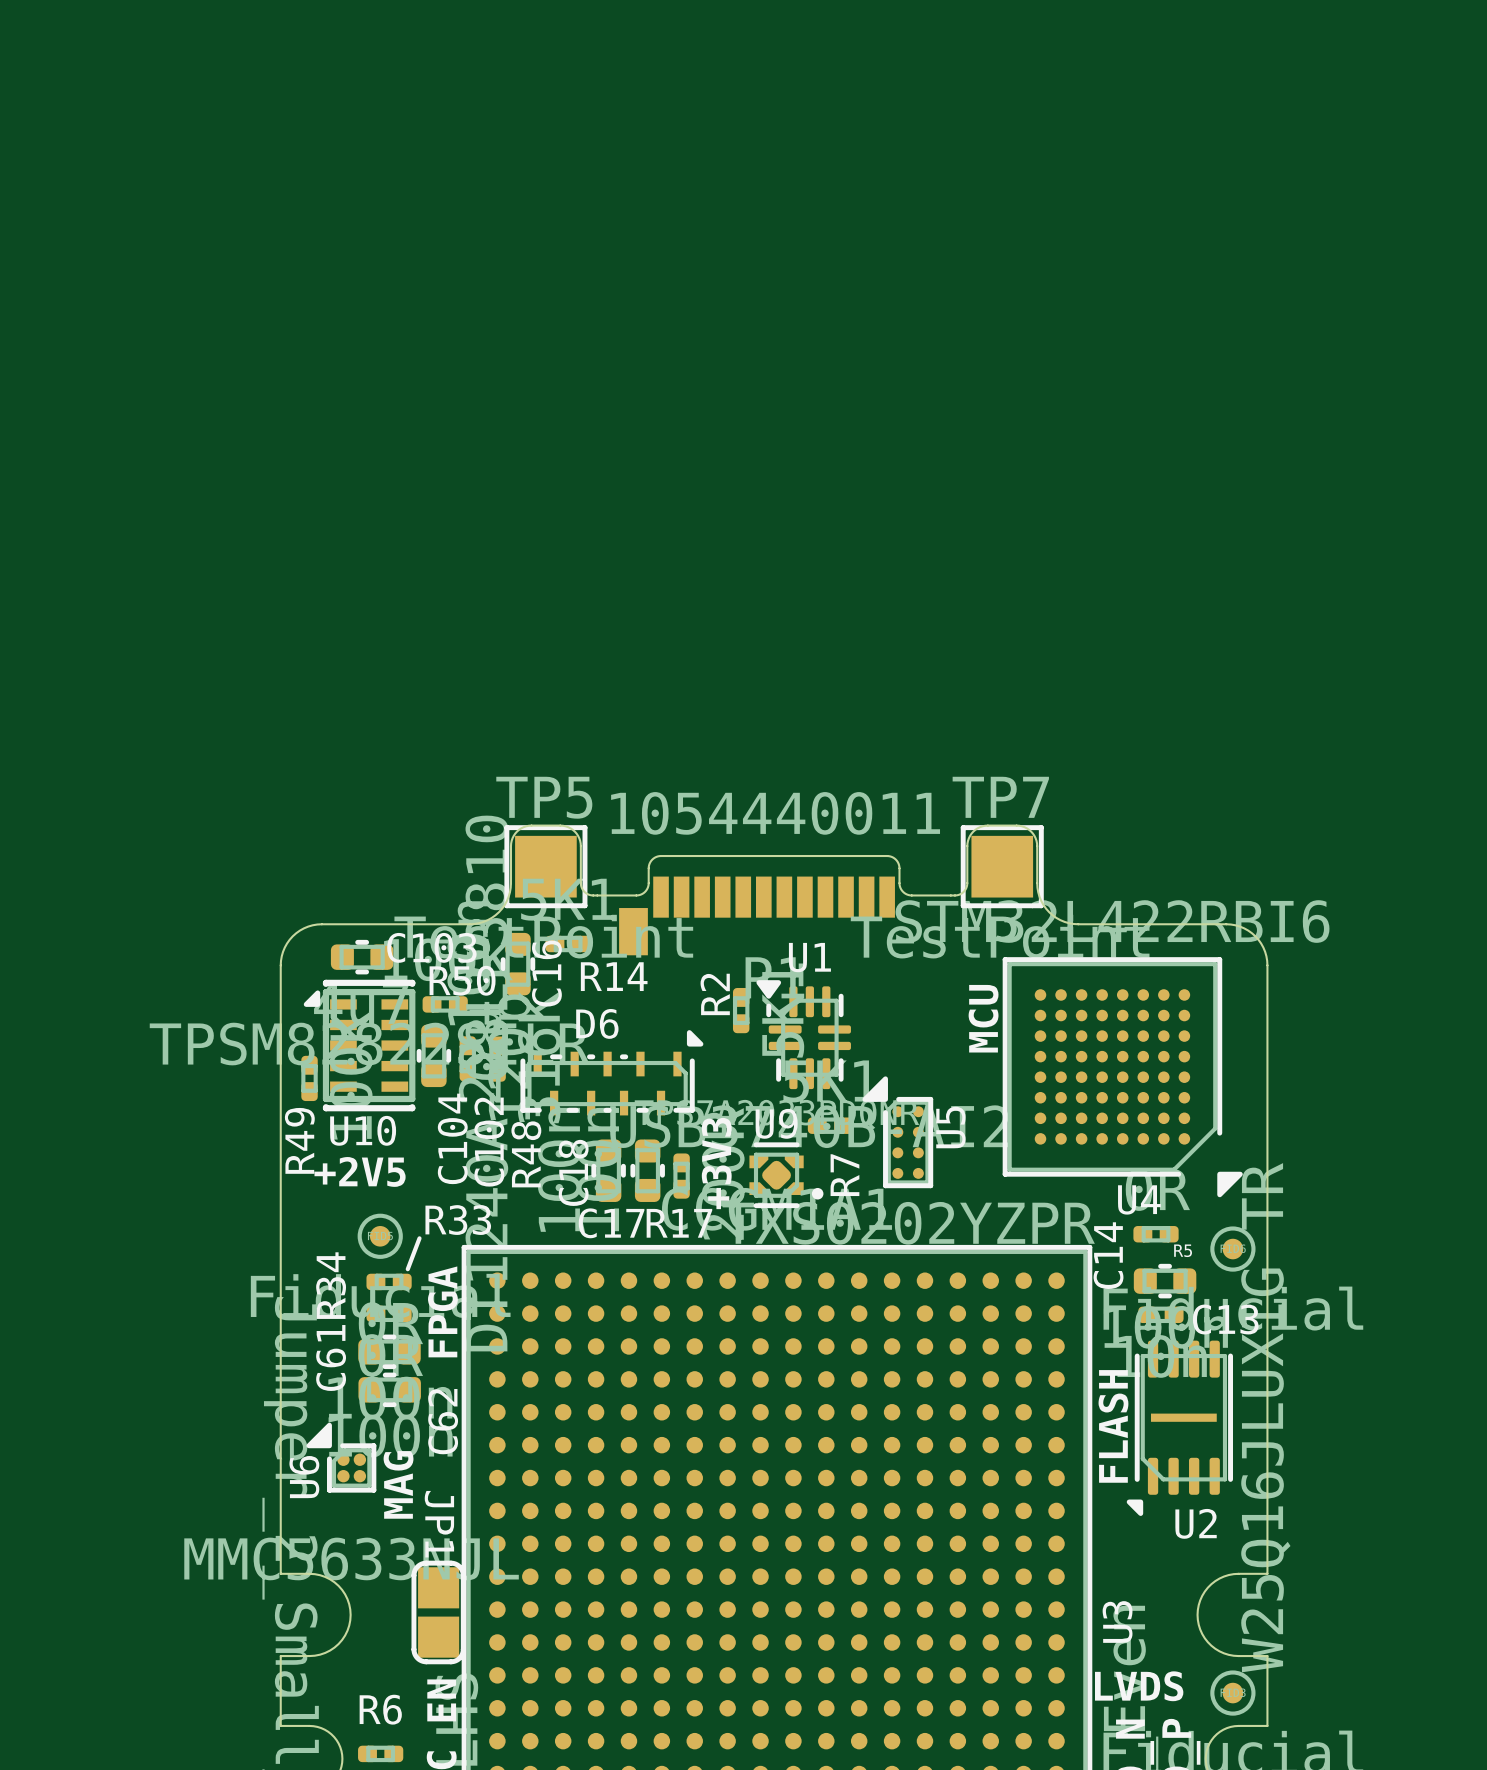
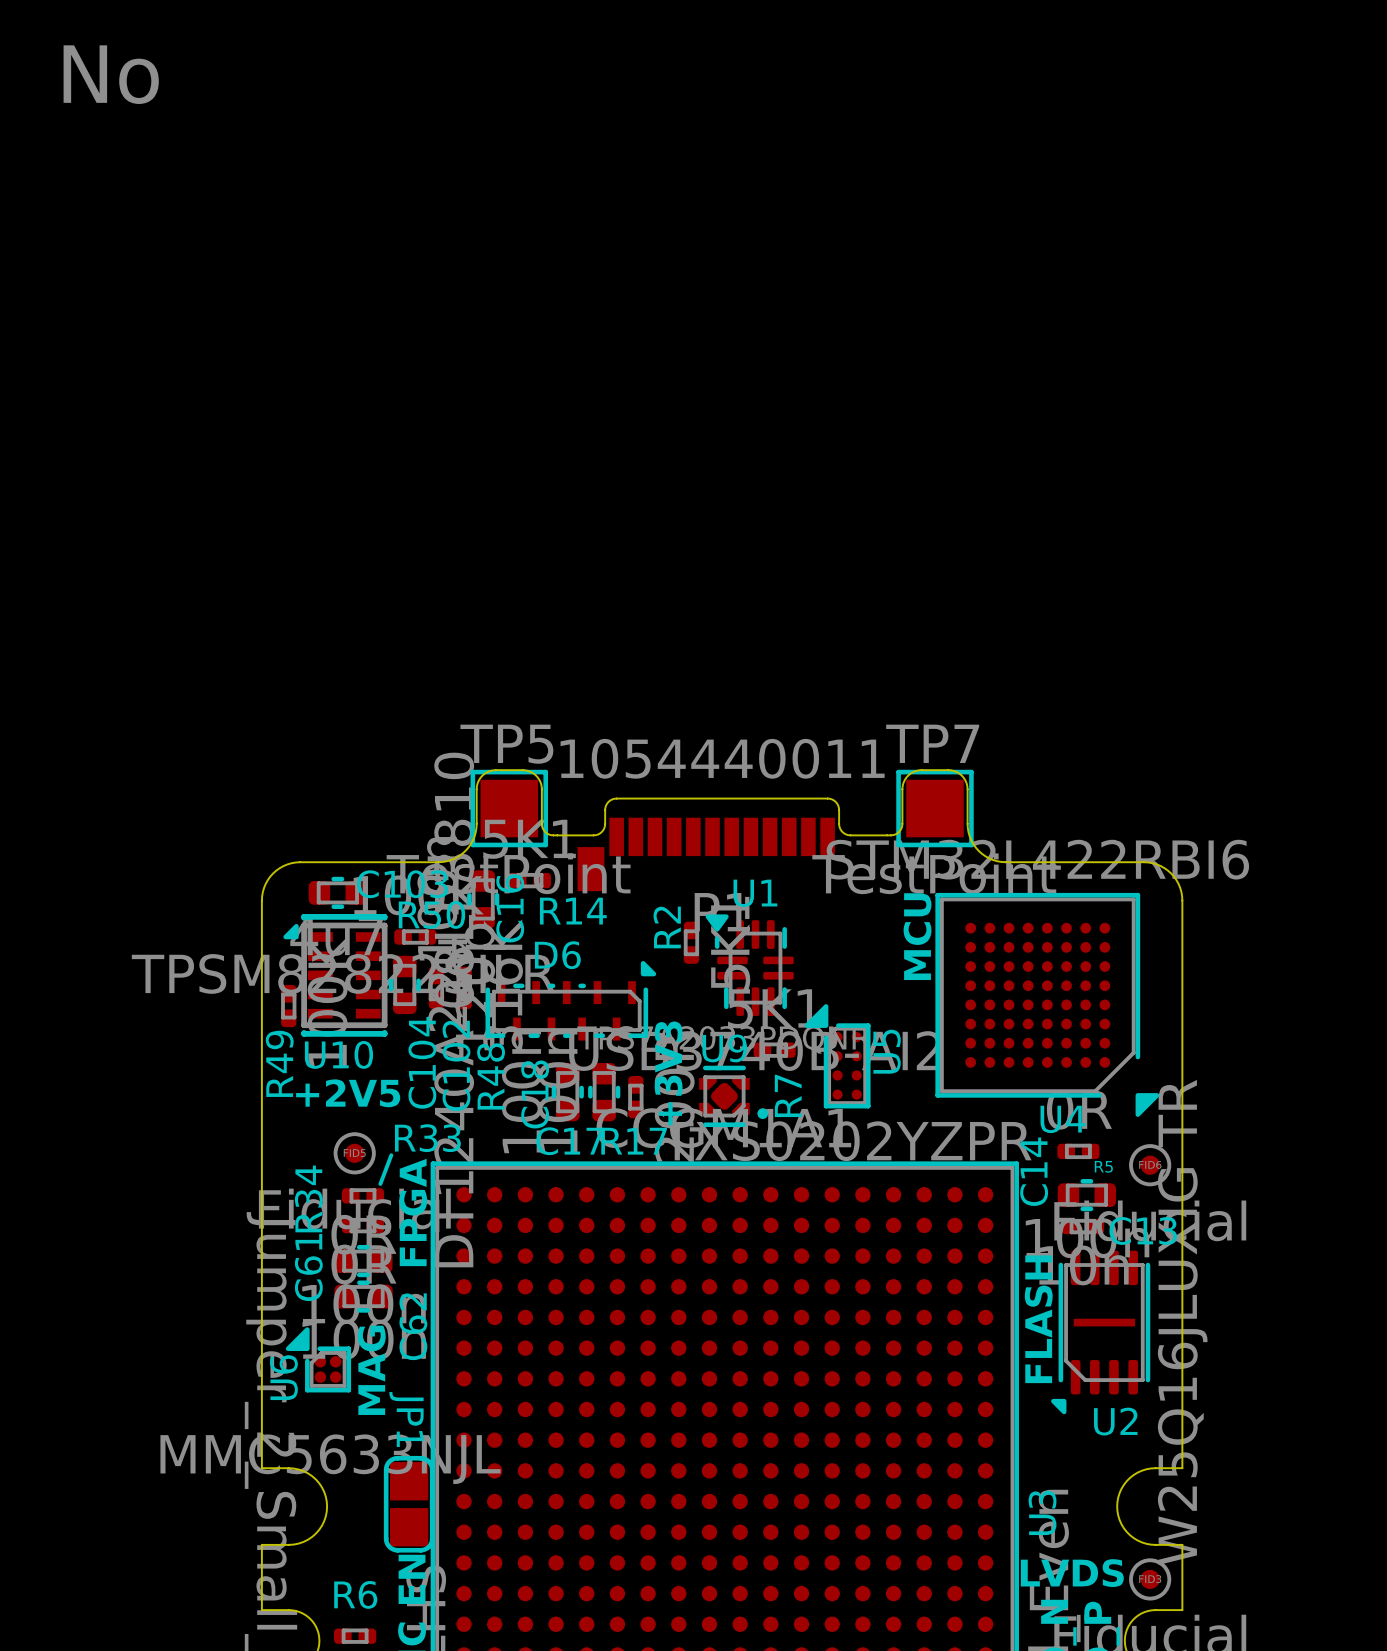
text: none -> No (111, 74)

